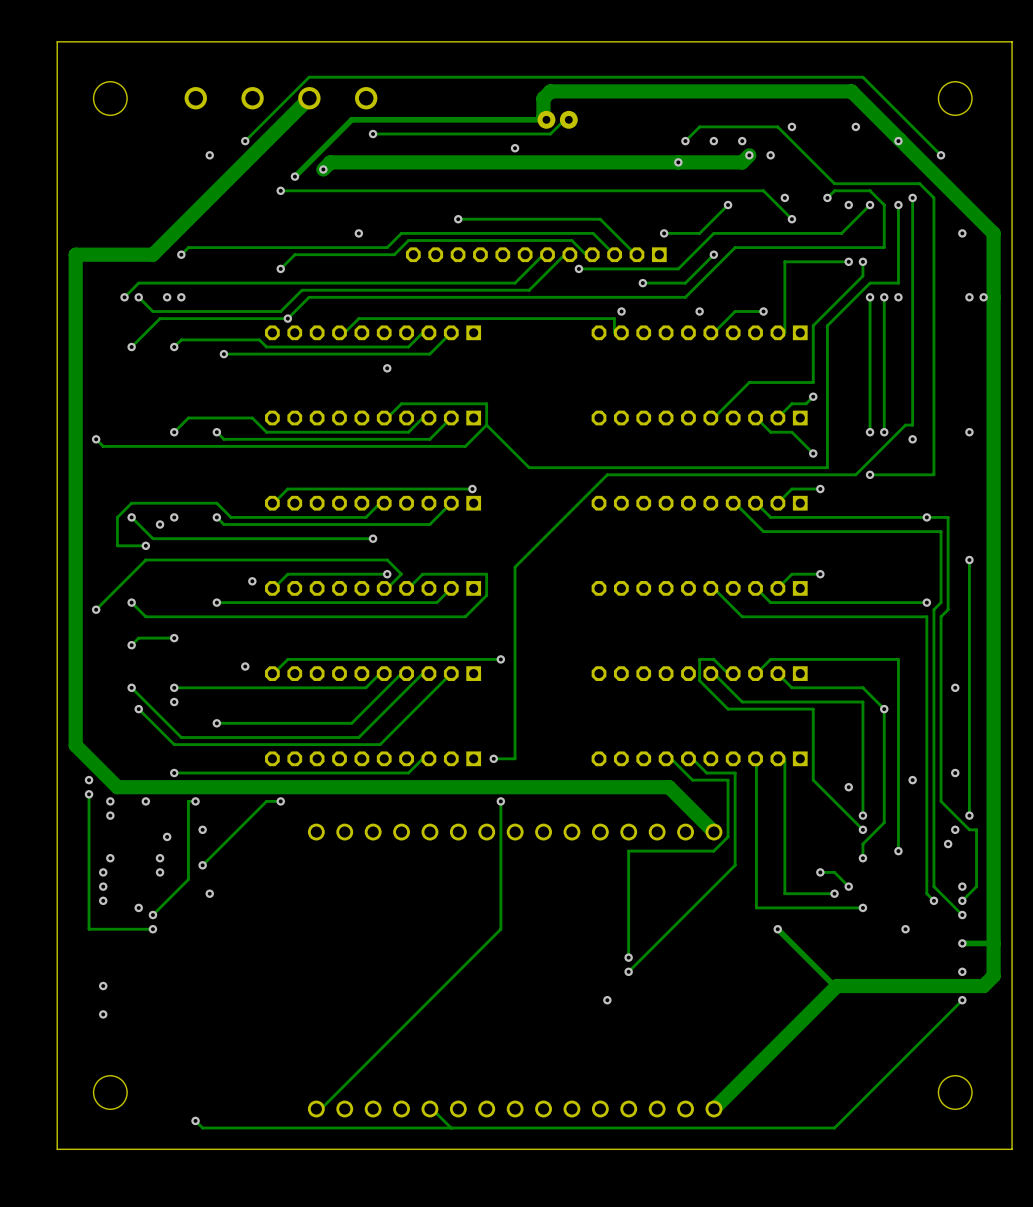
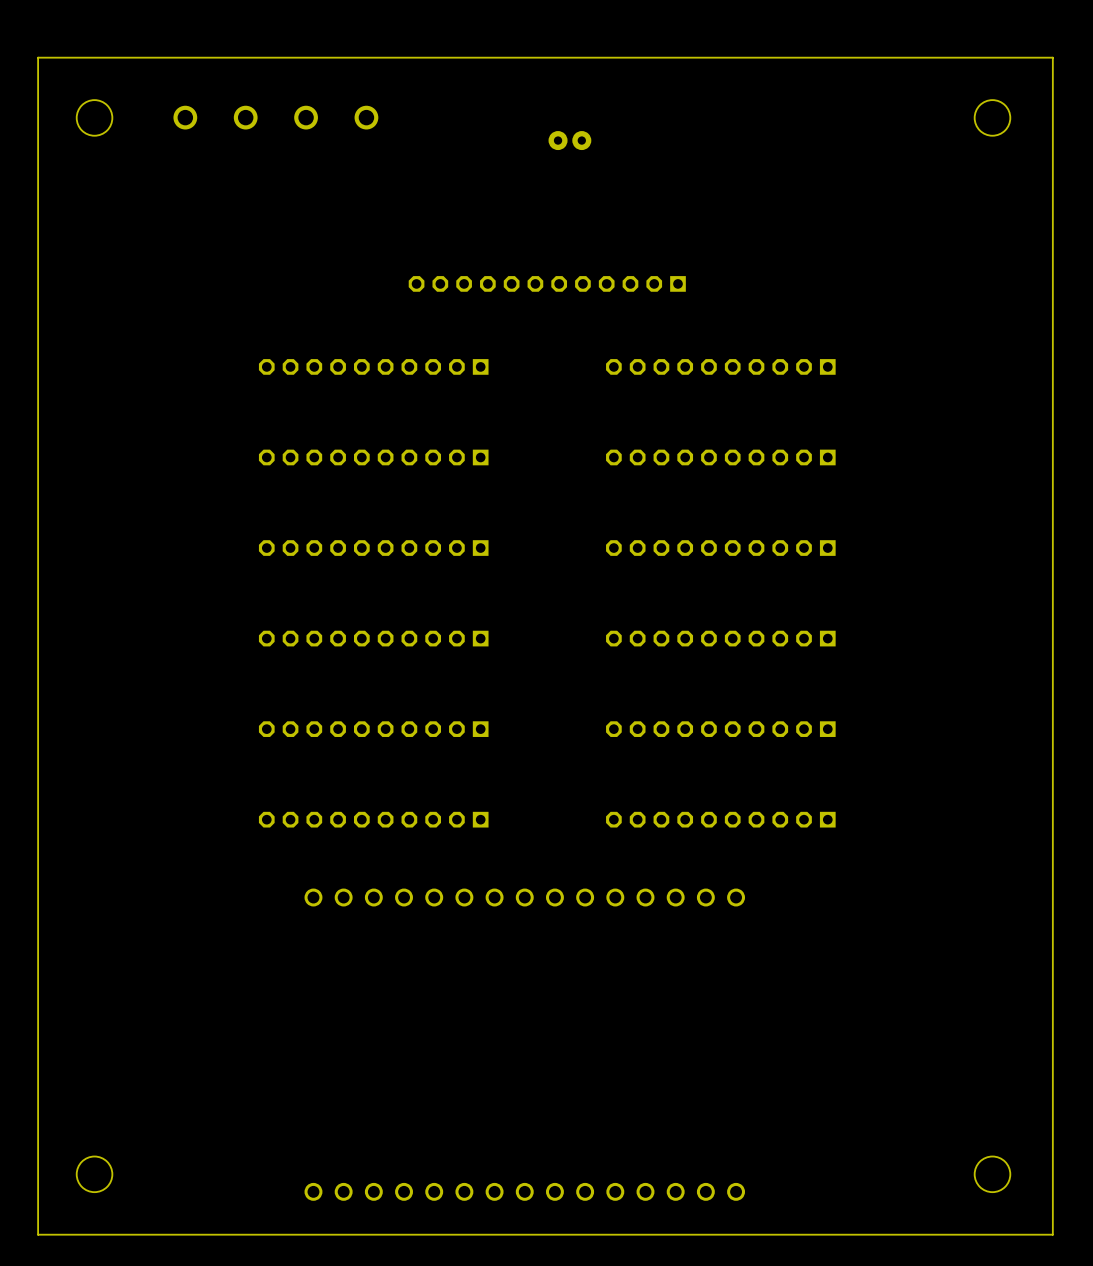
track: (309, 98) (152, 254) (75, 254) (75, 745) (117, 787) (669, 787) (713, 832) -> none
track: (568, 119) (564, 119) (550, 134) (373, 134) -> none
via: (791, 126) -> none
via: (855, 126) -> none
via: (373, 134) -> none
track: (245, 141) (309, 77) (862, 77) (941, 155) -> none
via: (245, 141) -> none
track: (685, 141) (699, 126) (777, 126) (834, 183) (919, 183) (933, 197) (933, 474) (870, 474) -> none
via: (685, 141) -> none
via: (713, 141) -> none
via: (742, 141) -> none
via: (898, 141) -> none
via: (515, 148) -> none
via: (209, 155) -> none
track: (749, 155) (742, 162) (330, 162) (323, 169) -> none
via: (749, 155) -> none
via: (770, 155) -> none
via: (941, 155) -> none
via: (678, 162) -> none
via: (323, 169) -> none
track: (294, 176) (351, 119) (546, 119) (543, 116) (543, 98) (550, 91) (851, 91) (993, 233) (993, 976) (983, 986) (836, 986) -> none
via: (294, 176) -> none
track: (280, 190) (763, 190) (791, 219) -> none
via: (280, 190) -> none
via: (784, 197) -> none
track: (827, 197) (834, 190) (870, 190) (884, 205) (884, 247) (735, 247) (685, 297) (309, 297) (287, 318) (160, 318) (131, 347) -> none
via: (827, 197) -> none
track: (912, 197) (912, 425) (905, 425) (855, 474) (607, 474) (515, 567) (515, 758) (493, 758) -> none
via: (912, 197) -> none
track: (728, 205) (699, 233) (664, 233) -> none
via: (728, 205) -> none
via: (848, 205) -> none
track: (870, 205) (841, 233) (713, 233) (678, 268) (578, 268) -> none
via: (870, 205) -> none
track: (898, 205) (898, 283) (870, 283) (827, 325) (827, 467) (529, 467) (486, 425) -> none
via: (898, 205) -> none
track: (458, 219) (600, 219) (636, 254) -> none
via: (458, 219) -> none
via: (791, 219) -> none
via: (358, 233) -> none
via: (664, 233) -> none
via: (962, 233) -> none
via: (181, 254) -> none
track: (547, 254) (543, 254) (515, 283) (138, 283) (124, 297) -> none
track: (569, 254) (564, 254) (529, 290) (302, 290) (280, 311) (152, 311) (138, 297) -> none
track: (592, 254) (586, 254) (571, 240) (408, 240) (394, 254) (294, 254) (280, 268) -> none
track: (614, 254) (593, 233) (401, 233) (387, 247) (188, 247) (181, 254) -> none
track: (713, 254) (685, 283) (642, 283) -> none
via: (713, 254) -> none
track: (848, 261) (784, 261) (784, 332) (777, 332) -> none
via: (848, 261) -> none
track: (862, 261) (862, 276) (813, 325) (813, 382) (749, 382) (713, 418) (710, 418) -> none
via: (862, 261) -> none
via: (280, 268) -> none
via: (578, 268) -> none
via: (642, 283) -> none
via: (124, 297) -> none
via: (138, 297) -> none
via: (167, 297) -> none
via: (181, 297) -> none
track: (870, 297) (870, 432) -> none
via: (870, 297) -> none
track: (884, 297) (884, 432) -> none
via: (884, 297) -> none
via: (898, 297) -> none
via: (969, 297) -> none
via: (983, 297) -> none
via: (621, 311) -> none
via: (699, 311) -> none
track: (763, 311) (735, 311) (713, 332) (710, 332) -> none
via: (763, 311) -> none
via: (287, 318) -> none
track: (428, 332) (422, 332) (408, 347) (266, 347) (259, 339) (181, 339) (174, 347) -> none
track: (451, 332) (429, 354) (223, 354) -> none
track: (621, 332) (614, 332) (614, 318) (358, 318) (344, 332) (339, 332) -> none
via: (131, 347) -> none
via: (174, 347) -> none
via: (223, 354) -> none
via: (387, 368) -> none
track: (813, 396) (806, 403) (791, 403) (777, 418) -> none
via: (813, 396) -> none
track: (384, 418) (387, 418) (401, 403) (486, 403) (486, 425) -> none
track: (428, 418) (422, 418) (408, 432) (266, 432) (252, 418) (188, 418) (174, 432) -> none
track: (451, 418) (429, 439) (223, 439) (216, 432) -> none
track: (755, 418) (770, 432) (791, 432) (813, 453) -> none
track: (486, 425) (465, 446) (103, 446) (96, 439) -> none
via: (174, 432) -> none
via: (216, 432) -> none
via: (870, 432) -> none
via: (884, 432) -> none
via: (969, 432) -> none
via: (96, 439) -> none
via: (912, 439) -> none
via: (813, 453) -> none
via: (870, 474) -> none
track: (472, 489) (287, 489) (272, 503) -> none
via: (472, 489) -> none
track: (820, 489) (791, 489) (777, 503) -> none
via: (820, 489) -> none
track: (384, 503) (380, 503) (365, 517) (231, 517) (216, 503) (131, 503) (117, 517) (117, 545) (145, 545) -> none
track: (451, 503) (429, 524) (223, 524) (216, 517) -> none
track: (733, 503) (763, 531) (941, 531) (941, 602) (933, 609) (933, 886) (962, 915) -> none
track: (755, 503) (770, 517) (948, 517) (948, 609) (941, 616) (941, 801) (969, 829) (976, 829) (976, 886) (962, 900) -> none
track: (131, 517) (152, 538) (373, 538) -> none
via: (131, 517) -> none
via: (174, 517) -> none
via: (216, 517) -> none
via: (926, 517) -> none
via: (160, 524) -> none
via: (373, 538) -> none
via: (145, 545) -> none
track: (969, 560) (969, 815) -> none
via: (969, 560) -> none
track: (387, 574) (287, 574) (272, 588) -> none
via: (387, 574) -> none
track: (820, 574) (791, 574) (777, 588) -> none
via: (820, 574) -> none
via: (252, 581) -> none
track: (384, 588) (387, 588) (401, 574) (387, 560) (145, 560) (96, 609) -> none
track: (406, 588) (422, 574) (486, 574) (486, 595) (465, 616) (145, 616) (131, 602) -> none
track: (451, 588) (436, 602) (216, 602) -> none
track: (710, 588) (713, 588) (742, 616) (926, 616) (926, 893) (933, 900) -> none
track: (755, 588) (770, 602) (926, 602) -> none
via: (131, 602) -> none
via: (216, 602) -> none
via: (926, 602) -> none
via: (96, 609) -> none
track: (174, 638) (138, 638) (131, 645) -> none
via: (174, 638) -> none
via: (131, 645) -> none
track: (500, 659) (287, 659) (272, 673) -> none
via: (500, 659) -> none
via: (245, 666) -> none
track: (384, 673) (380, 673) (365, 687) (174, 687) -> none
track: (406, 673) (401, 673) (351, 723) (216, 723) -> none
track: (428, 673) (422, 673) (358, 737) (181, 737) (131, 687) -> none
track: (451, 673) (380, 744) (174, 744) (138, 709) -> none
track: (710, 673) (713, 673) (742, 702) (862, 702) (862, 815) -> none
track: (733, 673) (728, 673) (713, 659) (699, 659) (699, 680) (728, 709) (813, 709) (813, 780) (862, 829) -> none
track: (755, 673) (770, 659) (898, 659) (898, 851) -> none
track: (777, 673) (791, 687) (862, 687) (884, 709) (884, 822) (862, 844) (862, 858) -> none
via: (131, 687) -> none
via: (174, 687) -> none
via: (955, 687) -> none
via: (174, 702) -> none
via: (138, 709) -> none
via: (884, 709) -> none
via: (216, 723) -> none
track: (428, 758) (422, 758) (408, 773) (174, 773) -> none
via: (493, 758) -> none
track: (666, 758) (671, 758) (692, 780) (728, 780) (728, 836) (713, 851) (628, 851) (628, 957) -> none
track: (688, 758) (692, 758) (706, 773) (735, 773) (735, 865) (628, 971) -> none
track: (755, 758) (756, 907) (862, 907) -> none
track: (777, 758) (784, 758) (784, 893) (834, 893) -> none
via: (174, 773) -> none
via: (955, 773) -> none
via: (89, 780) -> none
via: (912, 780) -> none
via: (848, 787) -> none
track: (89, 794) (89, 929) (152, 929) -> none
via: (89, 794) -> none
via: (110, 801) -> none
via: (145, 801) -> none
track: (195, 801) (188, 801) (188, 879) (152, 915) -> none
via: (195, 801) -> none
track: (280, 801) (266, 801) (202, 865) -> none
via: (280, 801) -> none
track: (500, 801) (500, 929) (323, 1106) (316, 1109) -> none
via: (500, 801) -> none
via: (110, 815) -> none
via: (862, 815) -> none
via: (969, 815) -> none
via: (202, 829) -> none
via: (862, 829) -> none
via: (955, 829) -> none
via: (167, 836) -> none
via: (948, 844) -> none
via: (898, 851) -> none
via: (110, 858) -> none
via: (160, 858) -> none
via: (862, 858) -> none
via: (202, 865) -> none
via: (103, 872) -> none
via: (160, 872) -> none
track: (820, 872) (834, 872) (848, 886) -> none
via: (820, 872) -> none
via: (103, 886) -> none
via: (848, 886) -> none
via: (962, 886) -> none
via: (209, 893) -> none
via: (834, 893) -> none
via: (103, 900) -> none
via: (933, 900) -> none
via: (962, 900) -> none
via: (138, 907) -> none
via: (862, 907) -> none
via: (152, 915) -> none
via: (962, 915) -> none
via: (152, 929) -> none
track: (777, 929) (834, 986) (836, 986) -> none
via: (777, 929) -> none
via: (905, 929) -> none
via: (962, 943) -> none
track: (993, 943) (962, 943) -> none
via: (628, 957) -> none
via: (628, 971) -> none
via: (962, 971) -> none
via: (103, 986) -> none
track: (836, 986) (713, 1109) -> none
via: (607, 1000) -> none
track: (962, 1000) (834, 1128) (202, 1128) (195, 1120) -> none
via: (962, 1000) -> none
via: (103, 1014) -> none
track: (429, 1109) (451, 1128) -> none
via: (195, 1120) -> none

